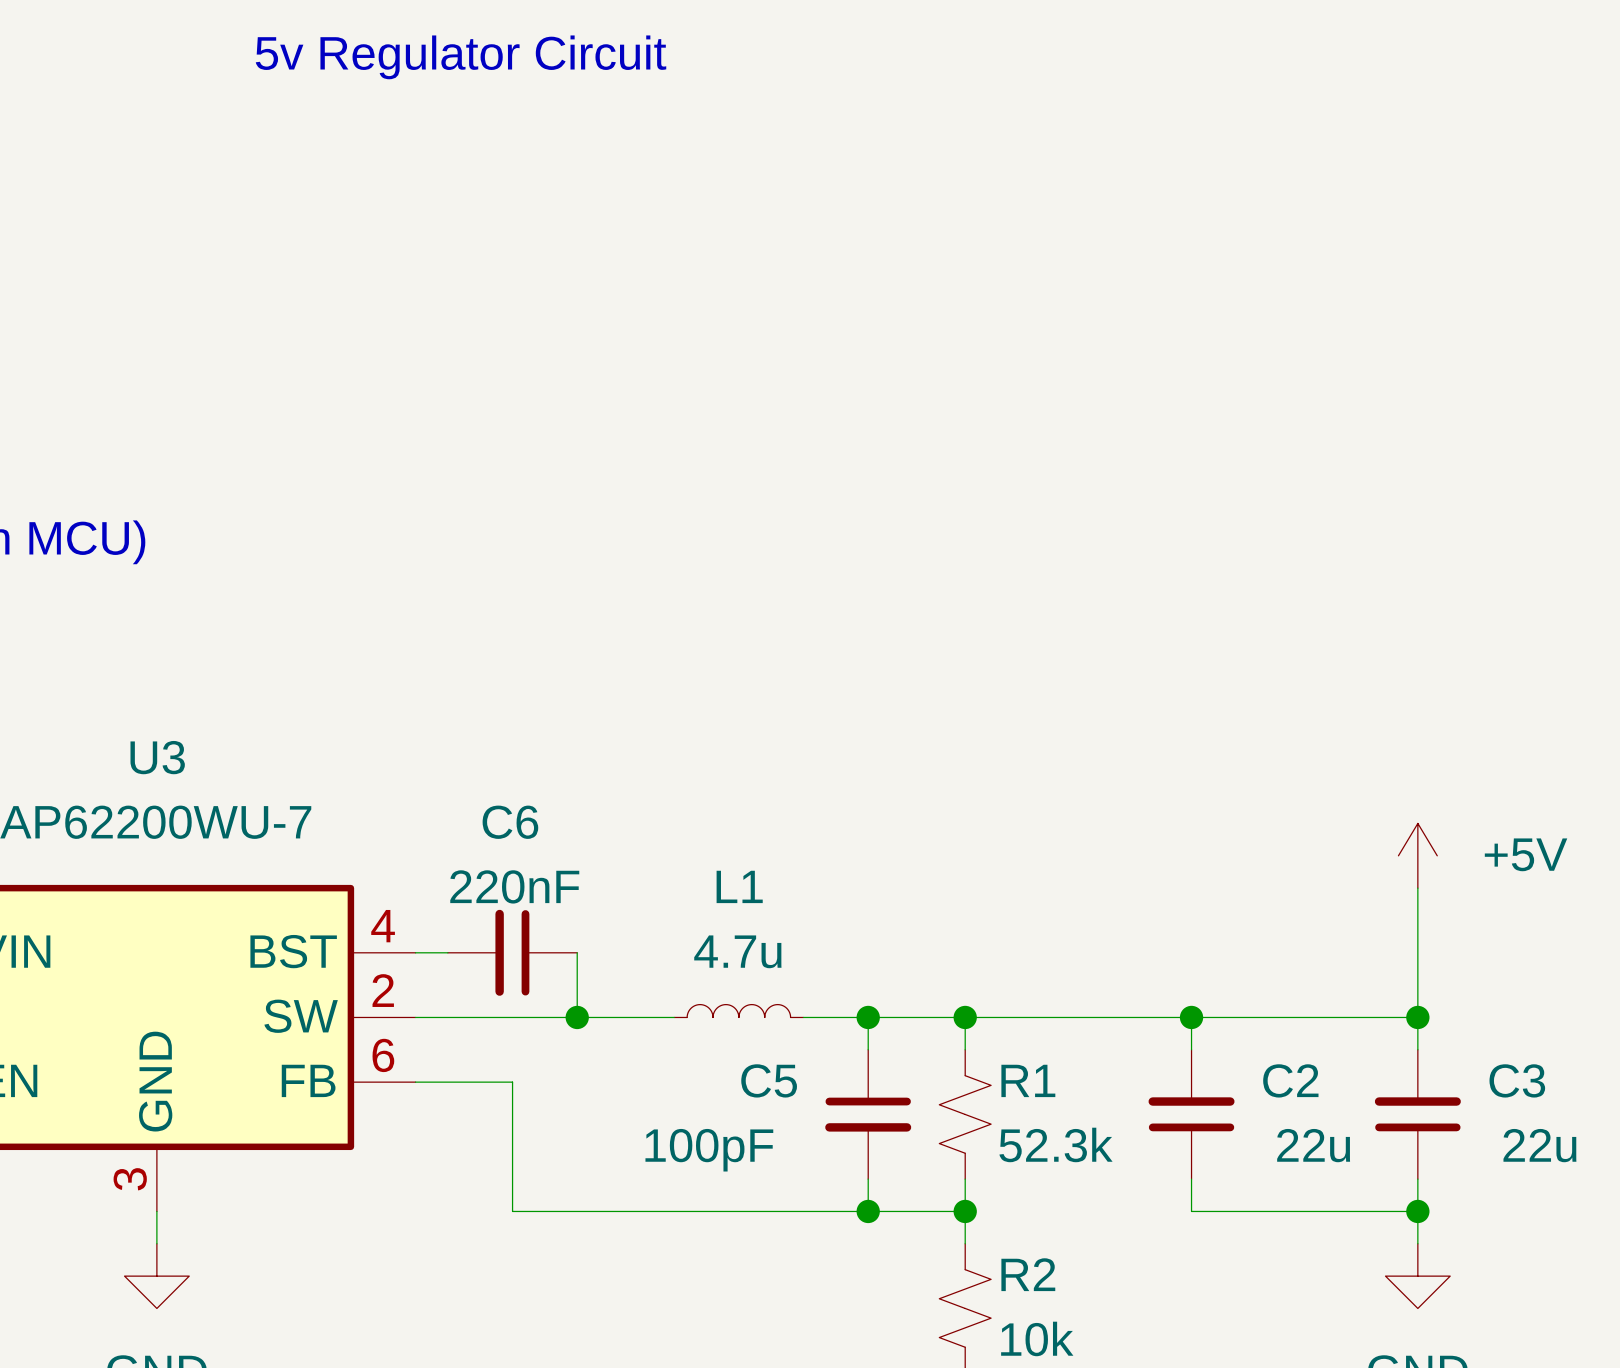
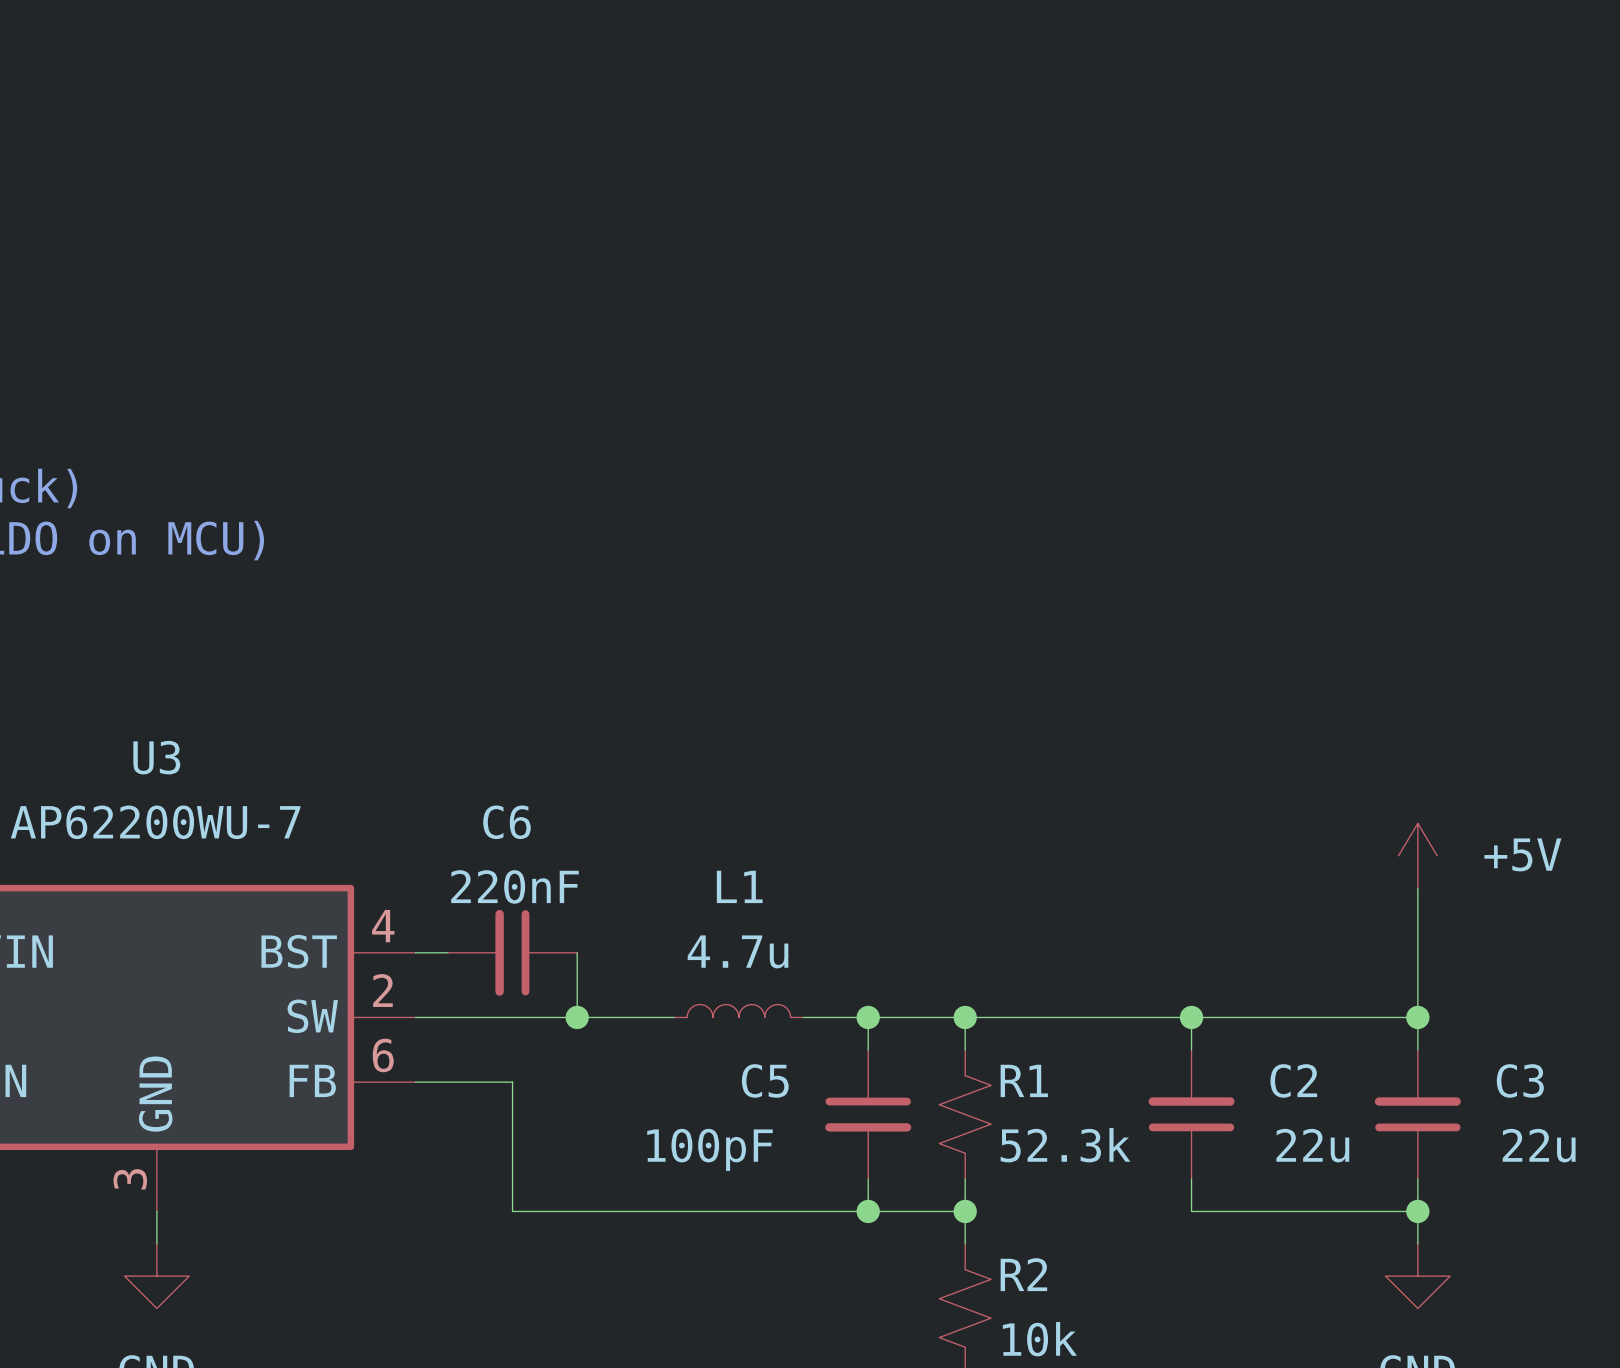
text: 5v Regulator Circuit (461, 57) -> none

